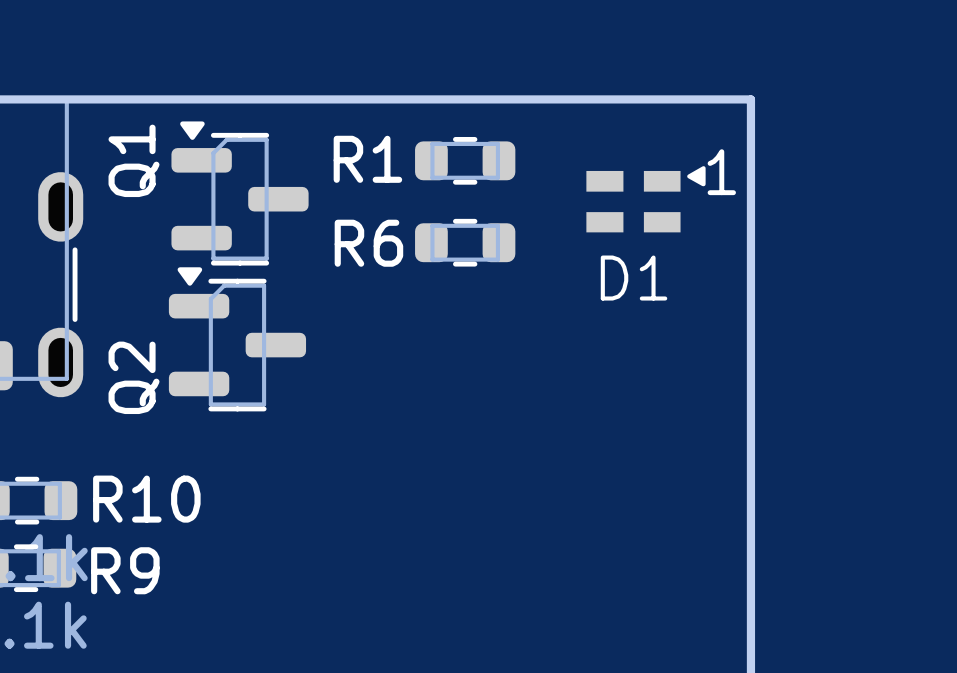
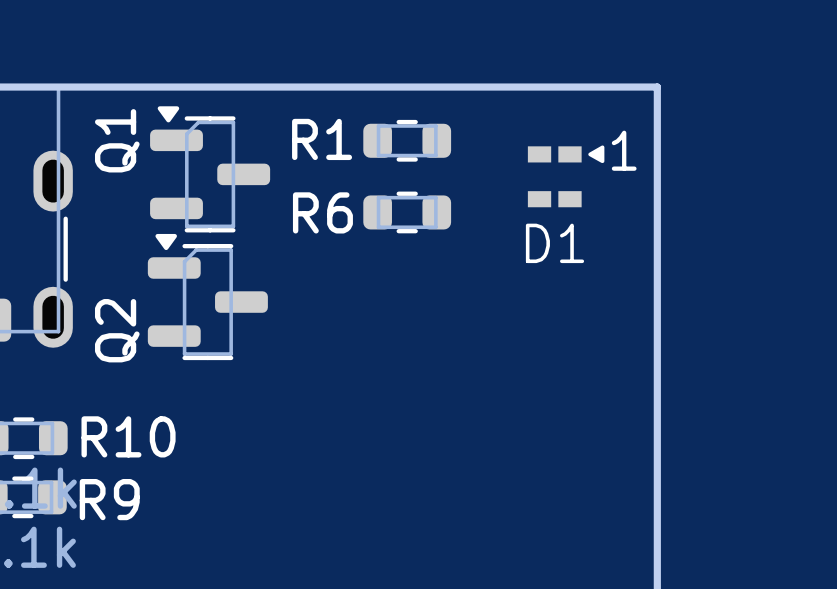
D1 footprint: [586, 166, 706, 233] -> [527, 145, 605, 208]

